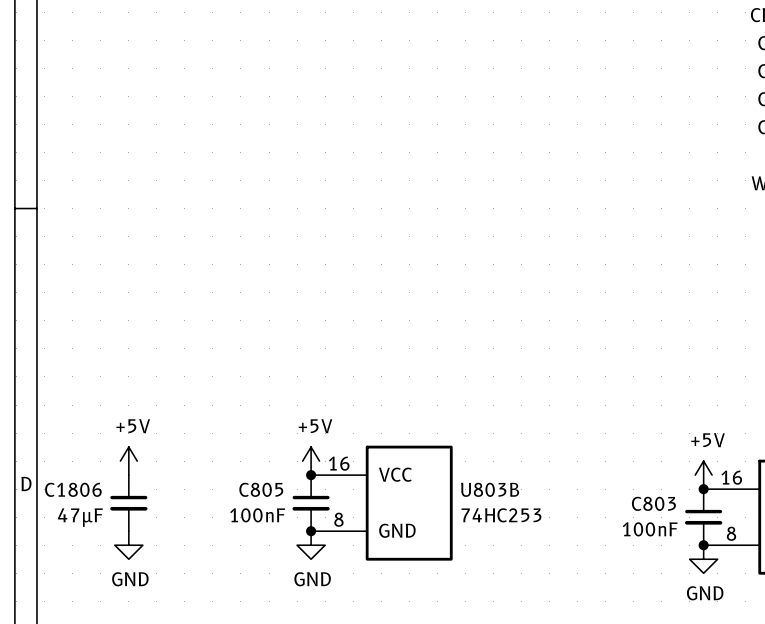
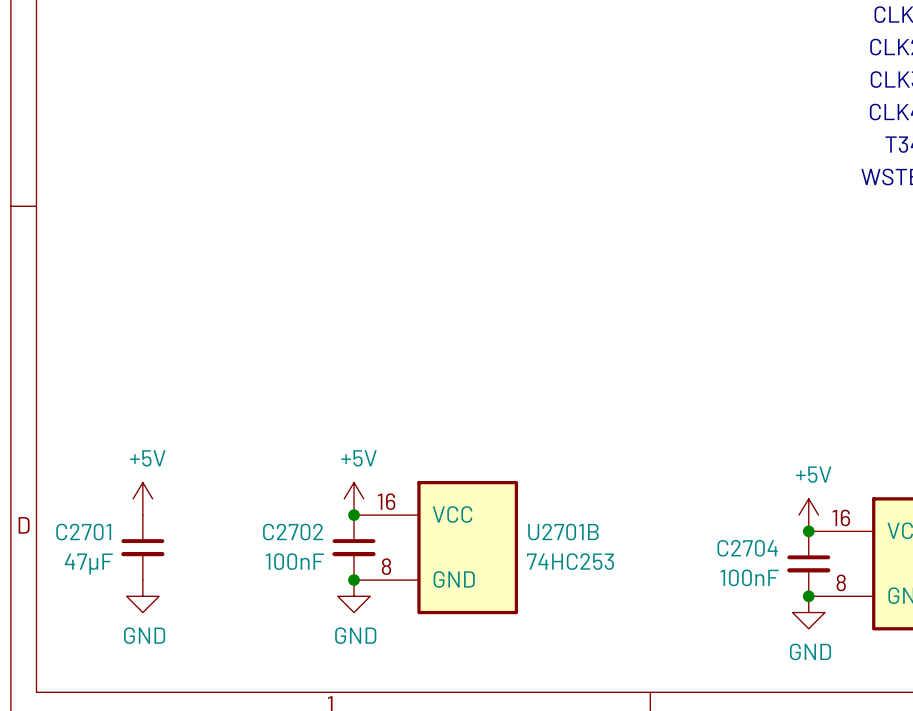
C1806 name: C1806 (73, 489) -> C2701 (83, 532)
C805 name: C805 (261, 489) -> C2702 (293, 532)
U803B name: U803B (490, 489) -> U2701B (563, 532)
C803 name: C803 (653, 503) -> C2704 (747, 548)

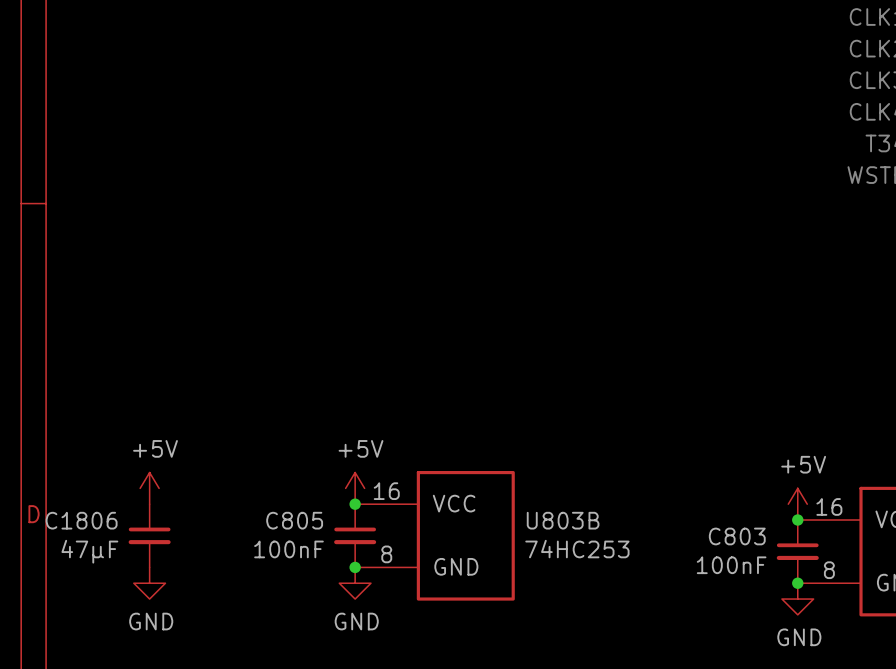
C2701 name: C2701 (83, 532) -> C1806 (81, 520)
C2702 name: C2702 (293, 532) -> C805 (294, 520)
U2701B name: U2701B (563, 532) -> U803B (563, 520)
C2704 name: C2704 (747, 548) -> C803 (737, 536)

